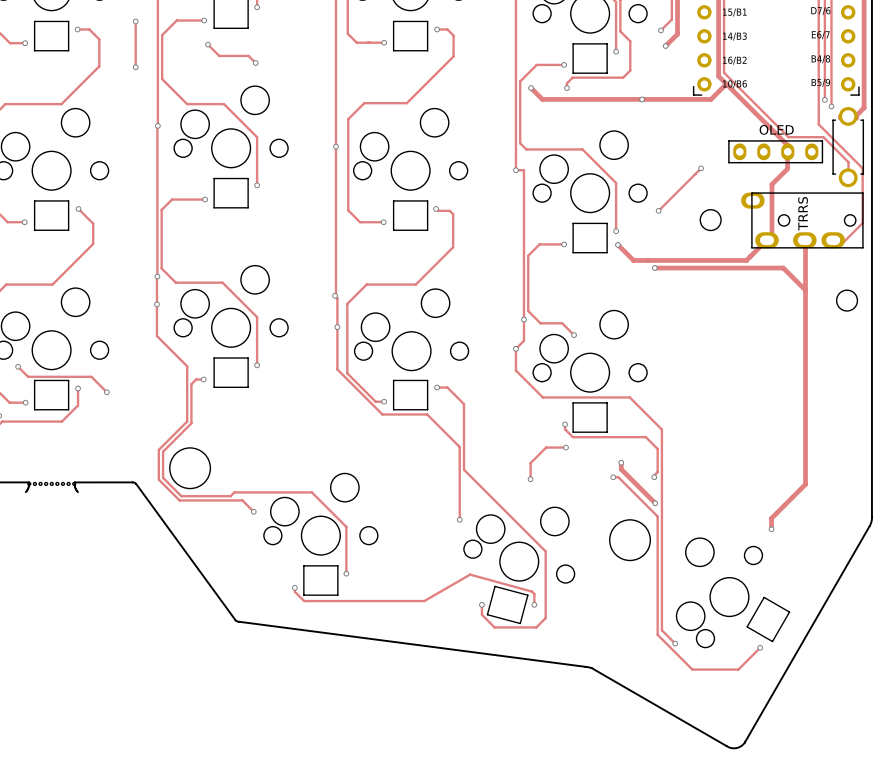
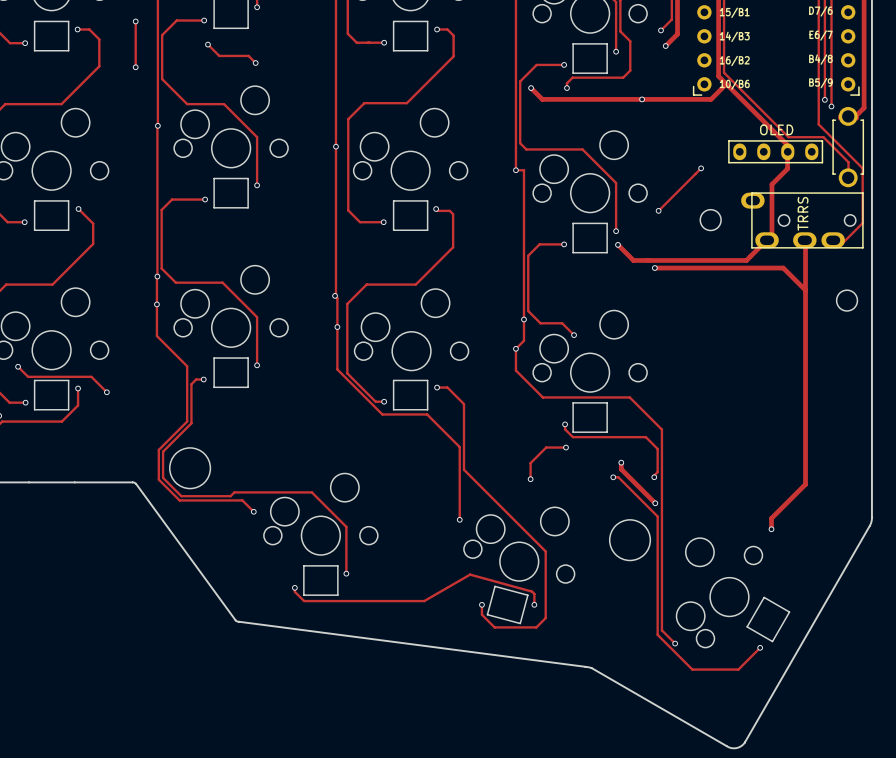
board edge: (29, 482) (25, 492) -> (29, 482) (74, 482)
board edge: (74, 482) (77, 492) -> none
part: (51, 483) -> none

